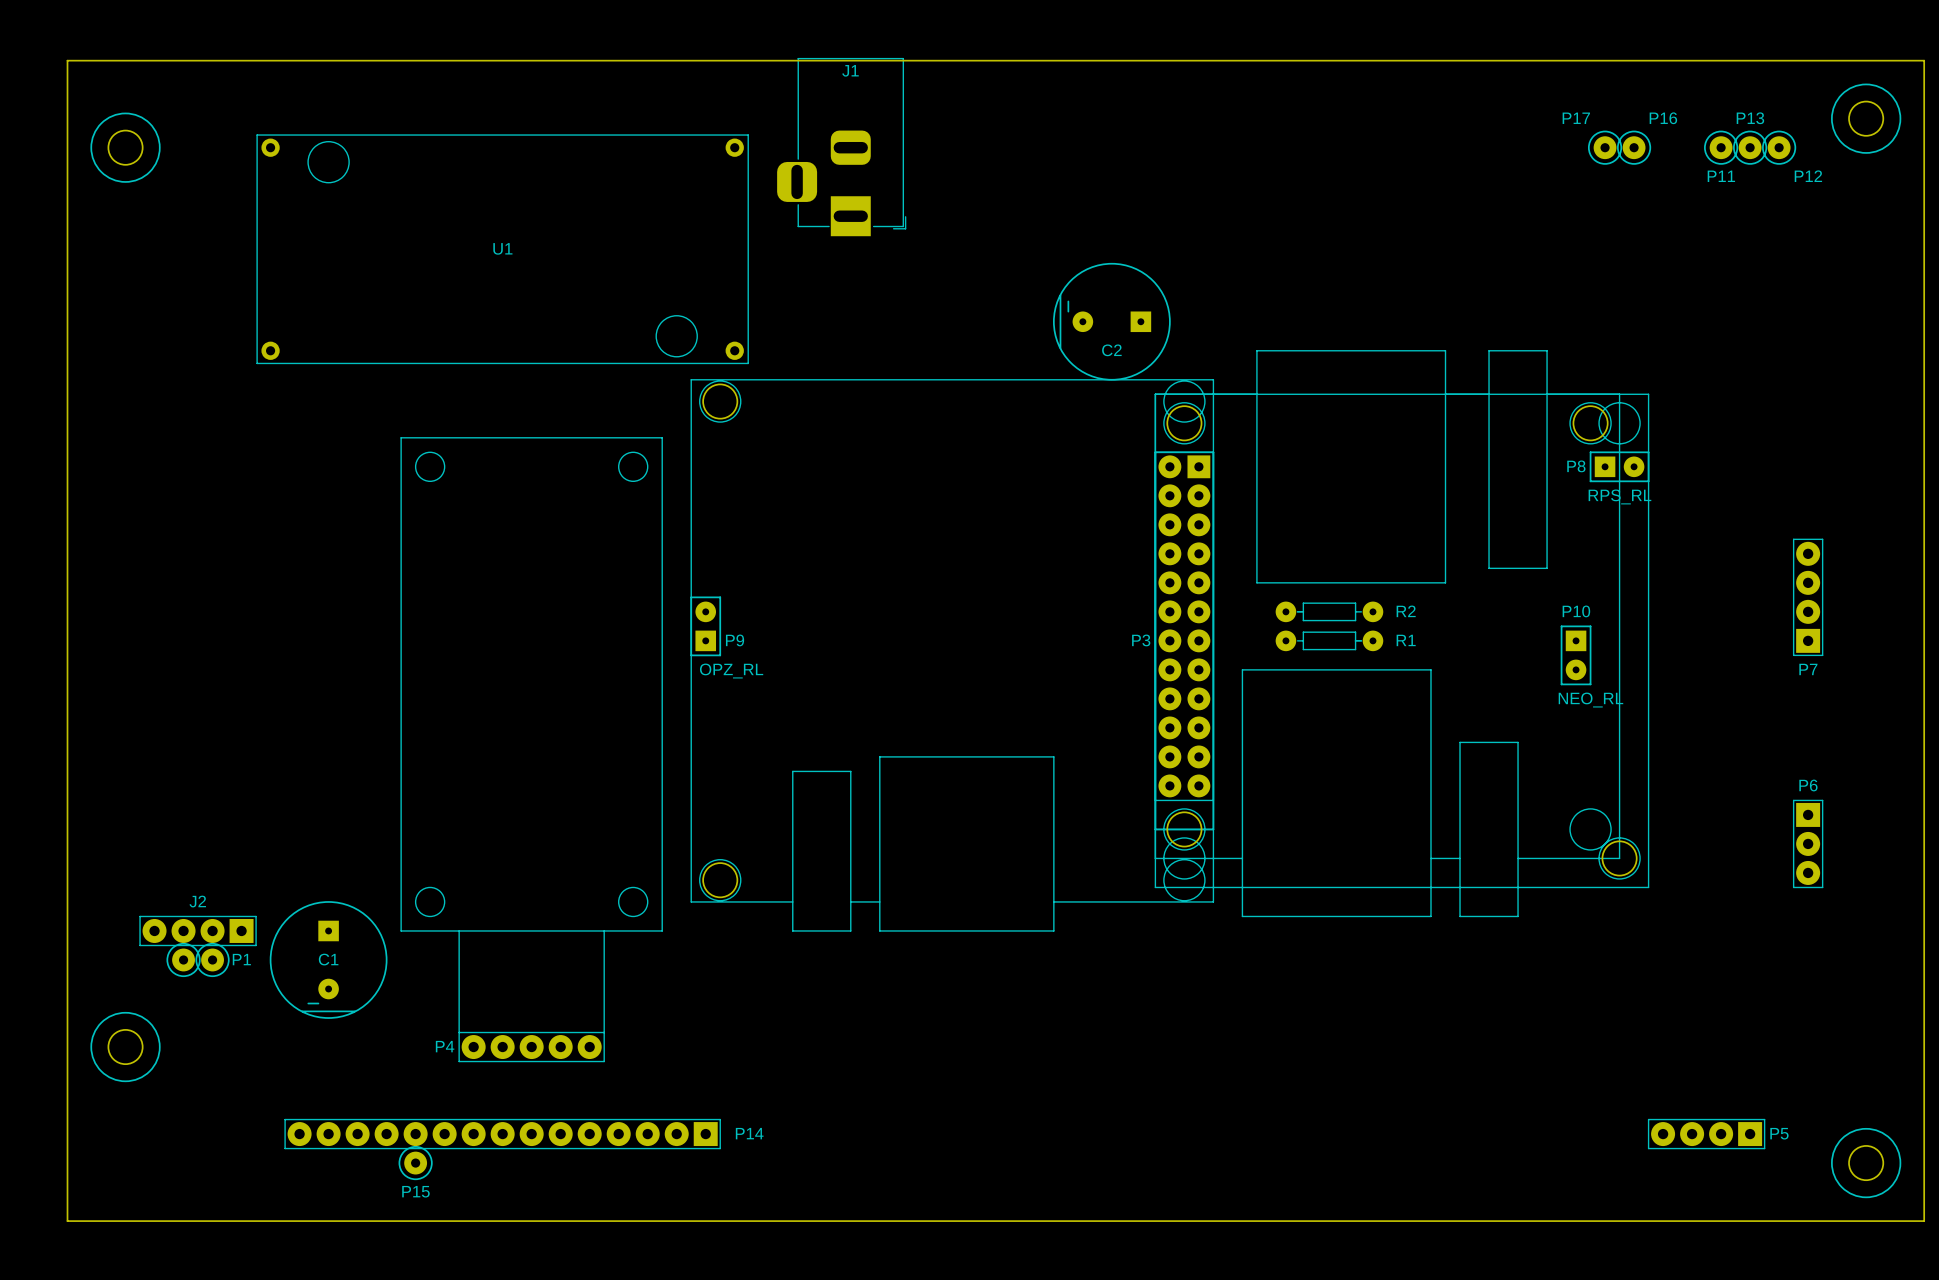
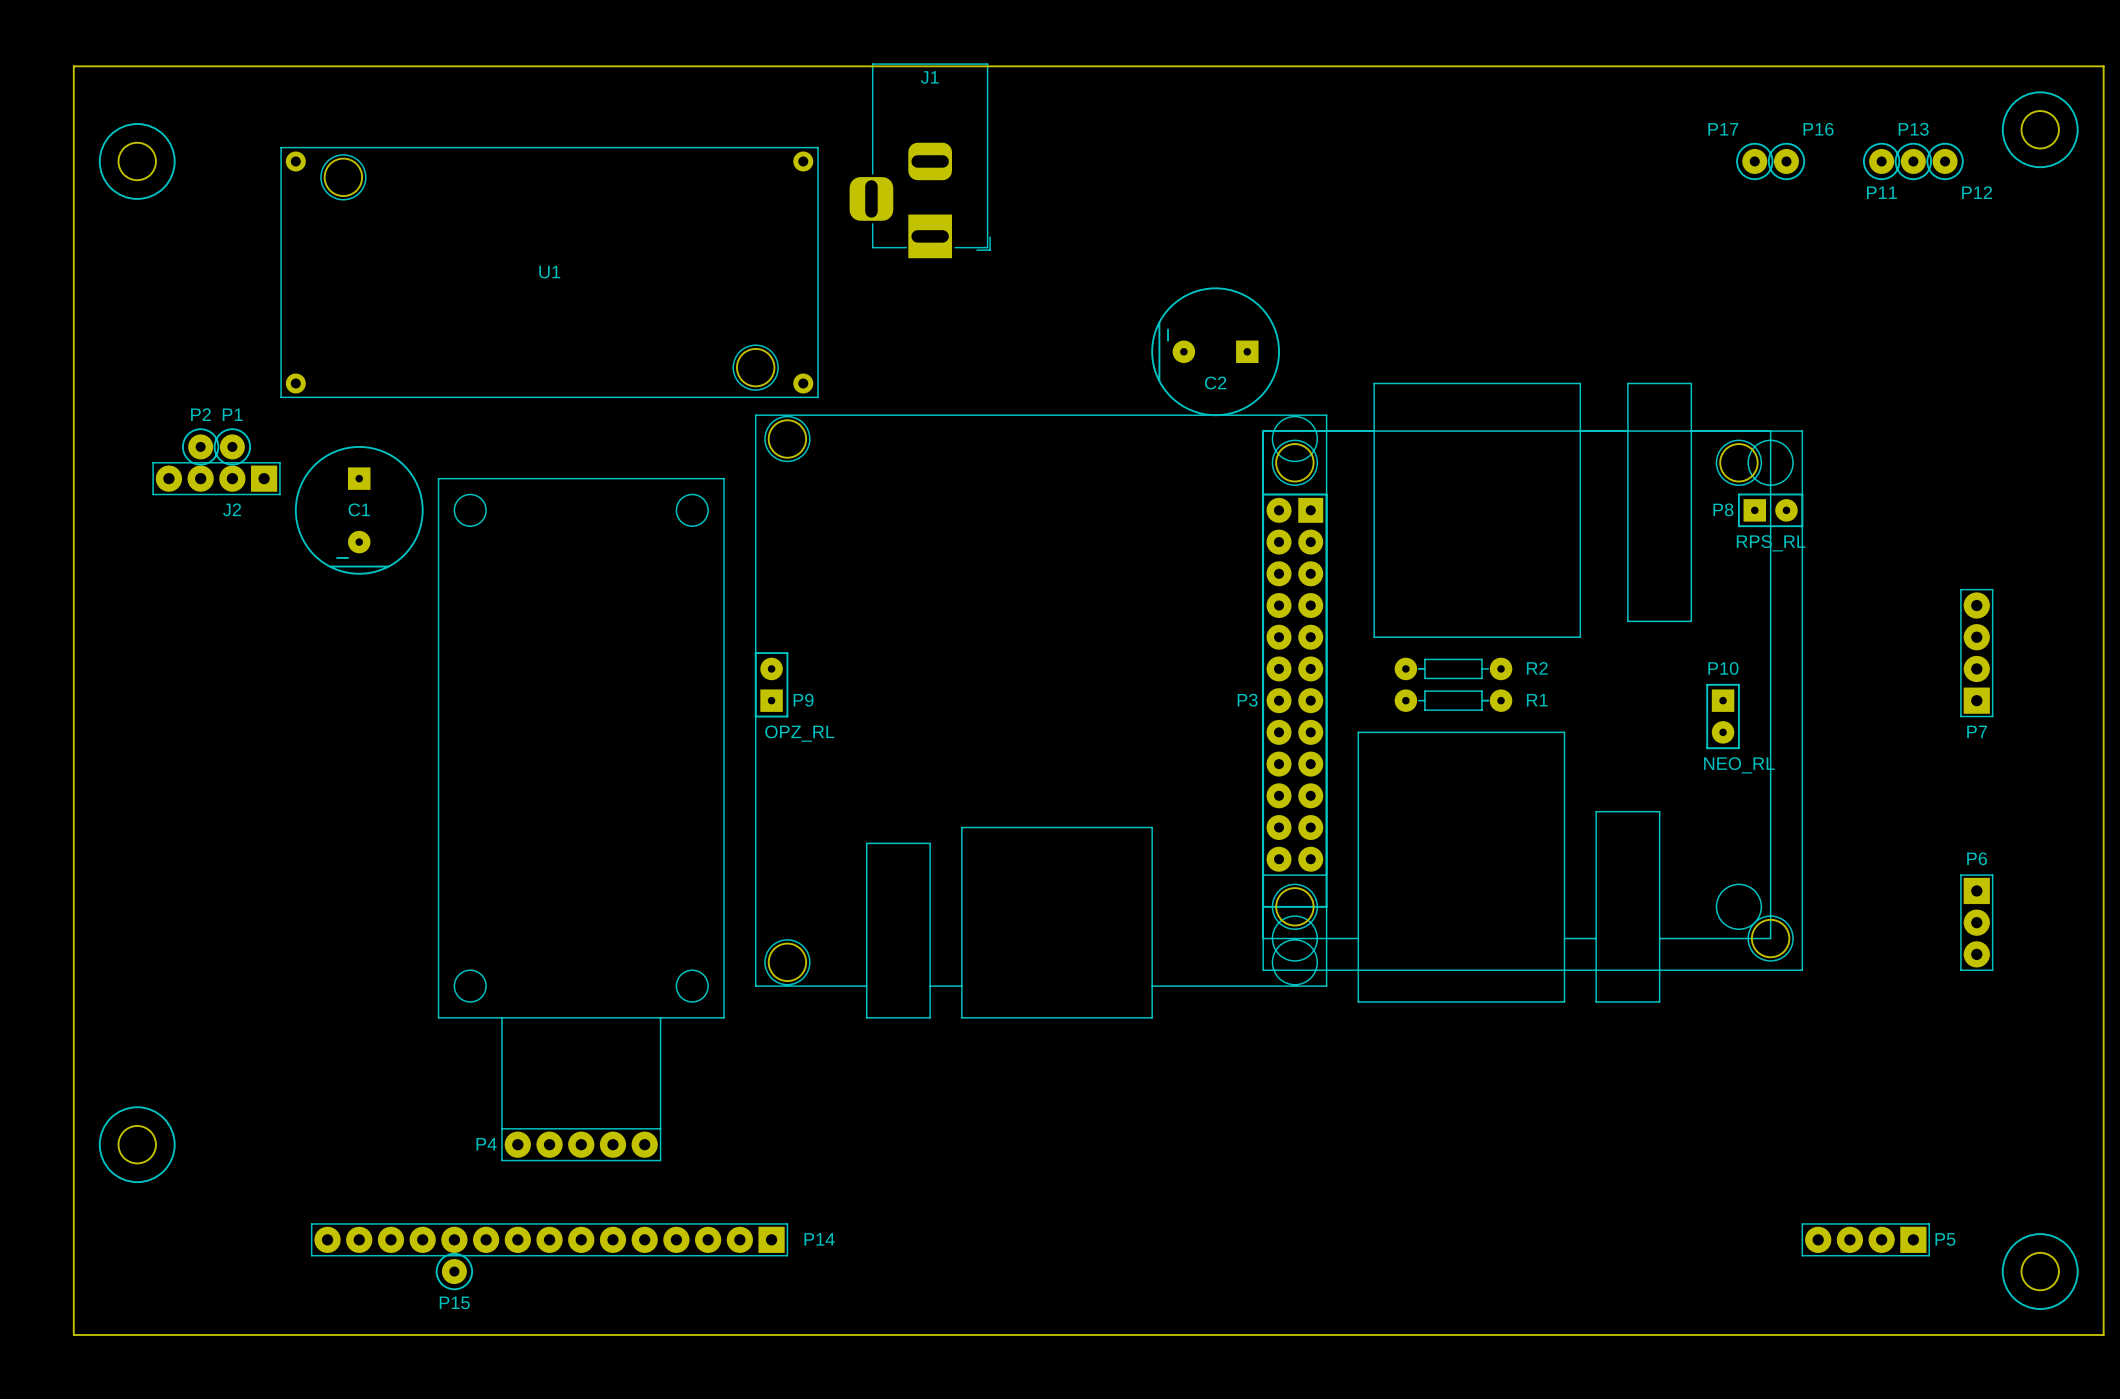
U1 footprint: [256, 134, 749, 365] -> [280, 146, 819, 399]
round board edge: none -> [323, 157, 364, 198]
round board edge: none -> [736, 347, 776, 388]
P2: none -> (200, 446)
J2 name position: J2 (197, 901) -> J2 (232, 509)
J2 position: (198, 930) -> (216, 478)
part: (183, 959) -> none
P1 position: (212, 959) -> (232, 446)
P1 name position: P1 (241, 959) -> P1 (232, 414)
C1 position: (328, 959) -> (359, 510)

